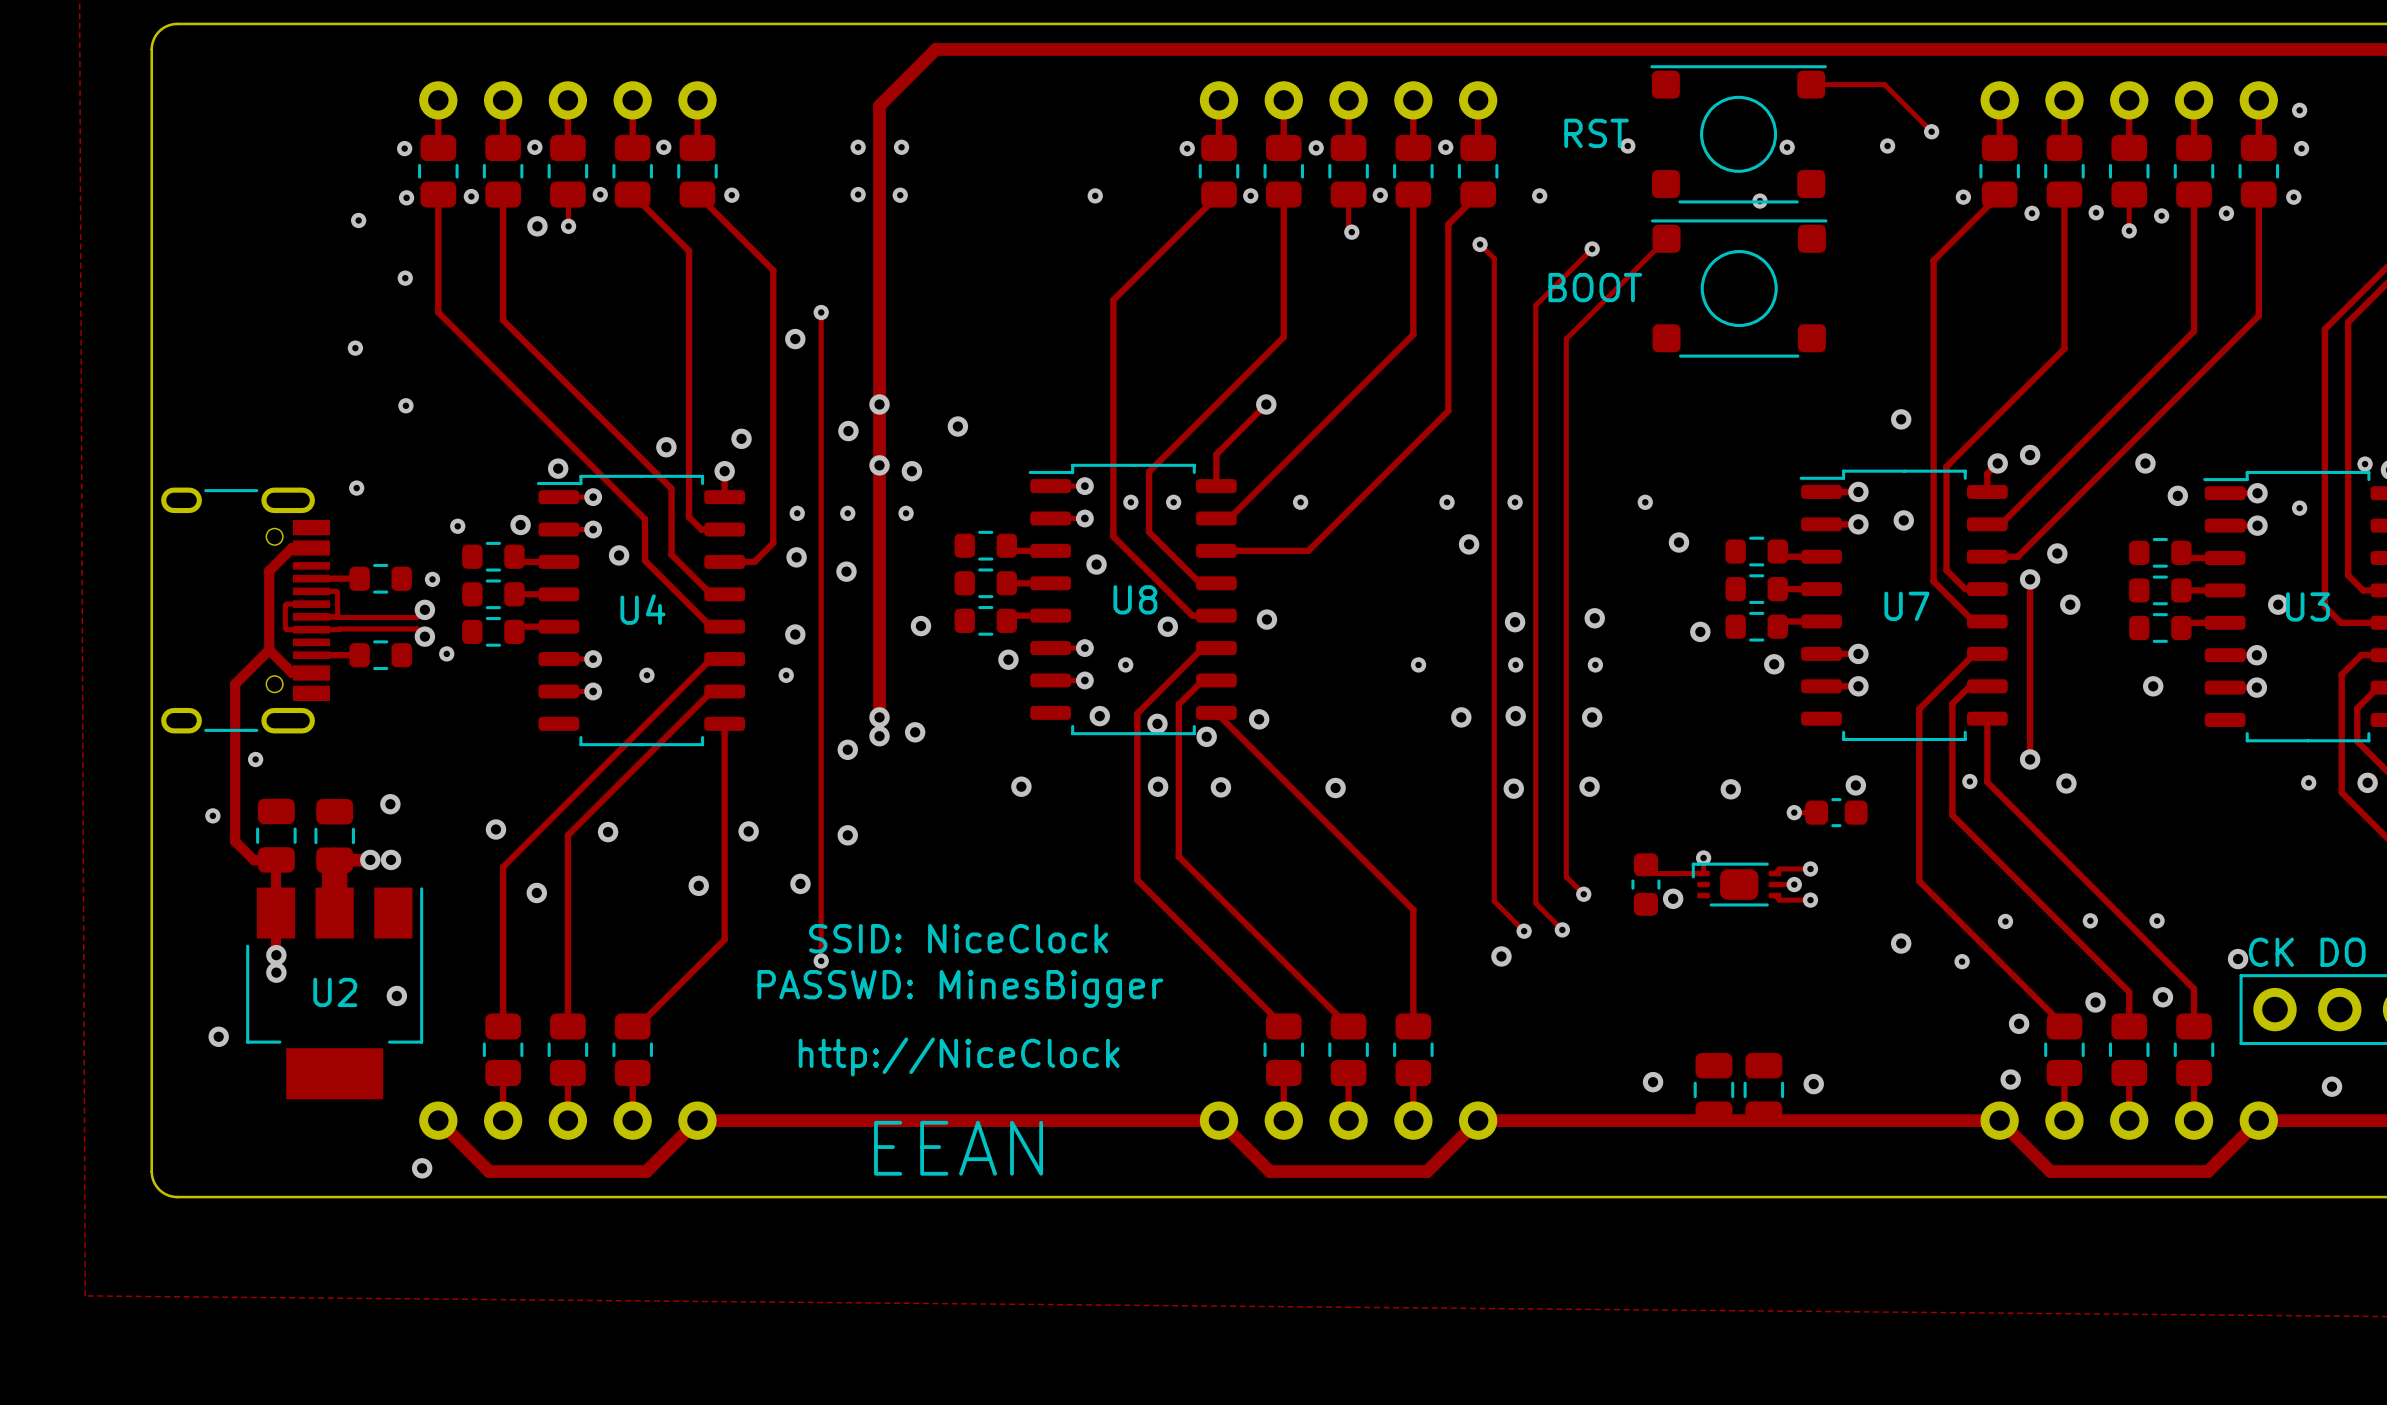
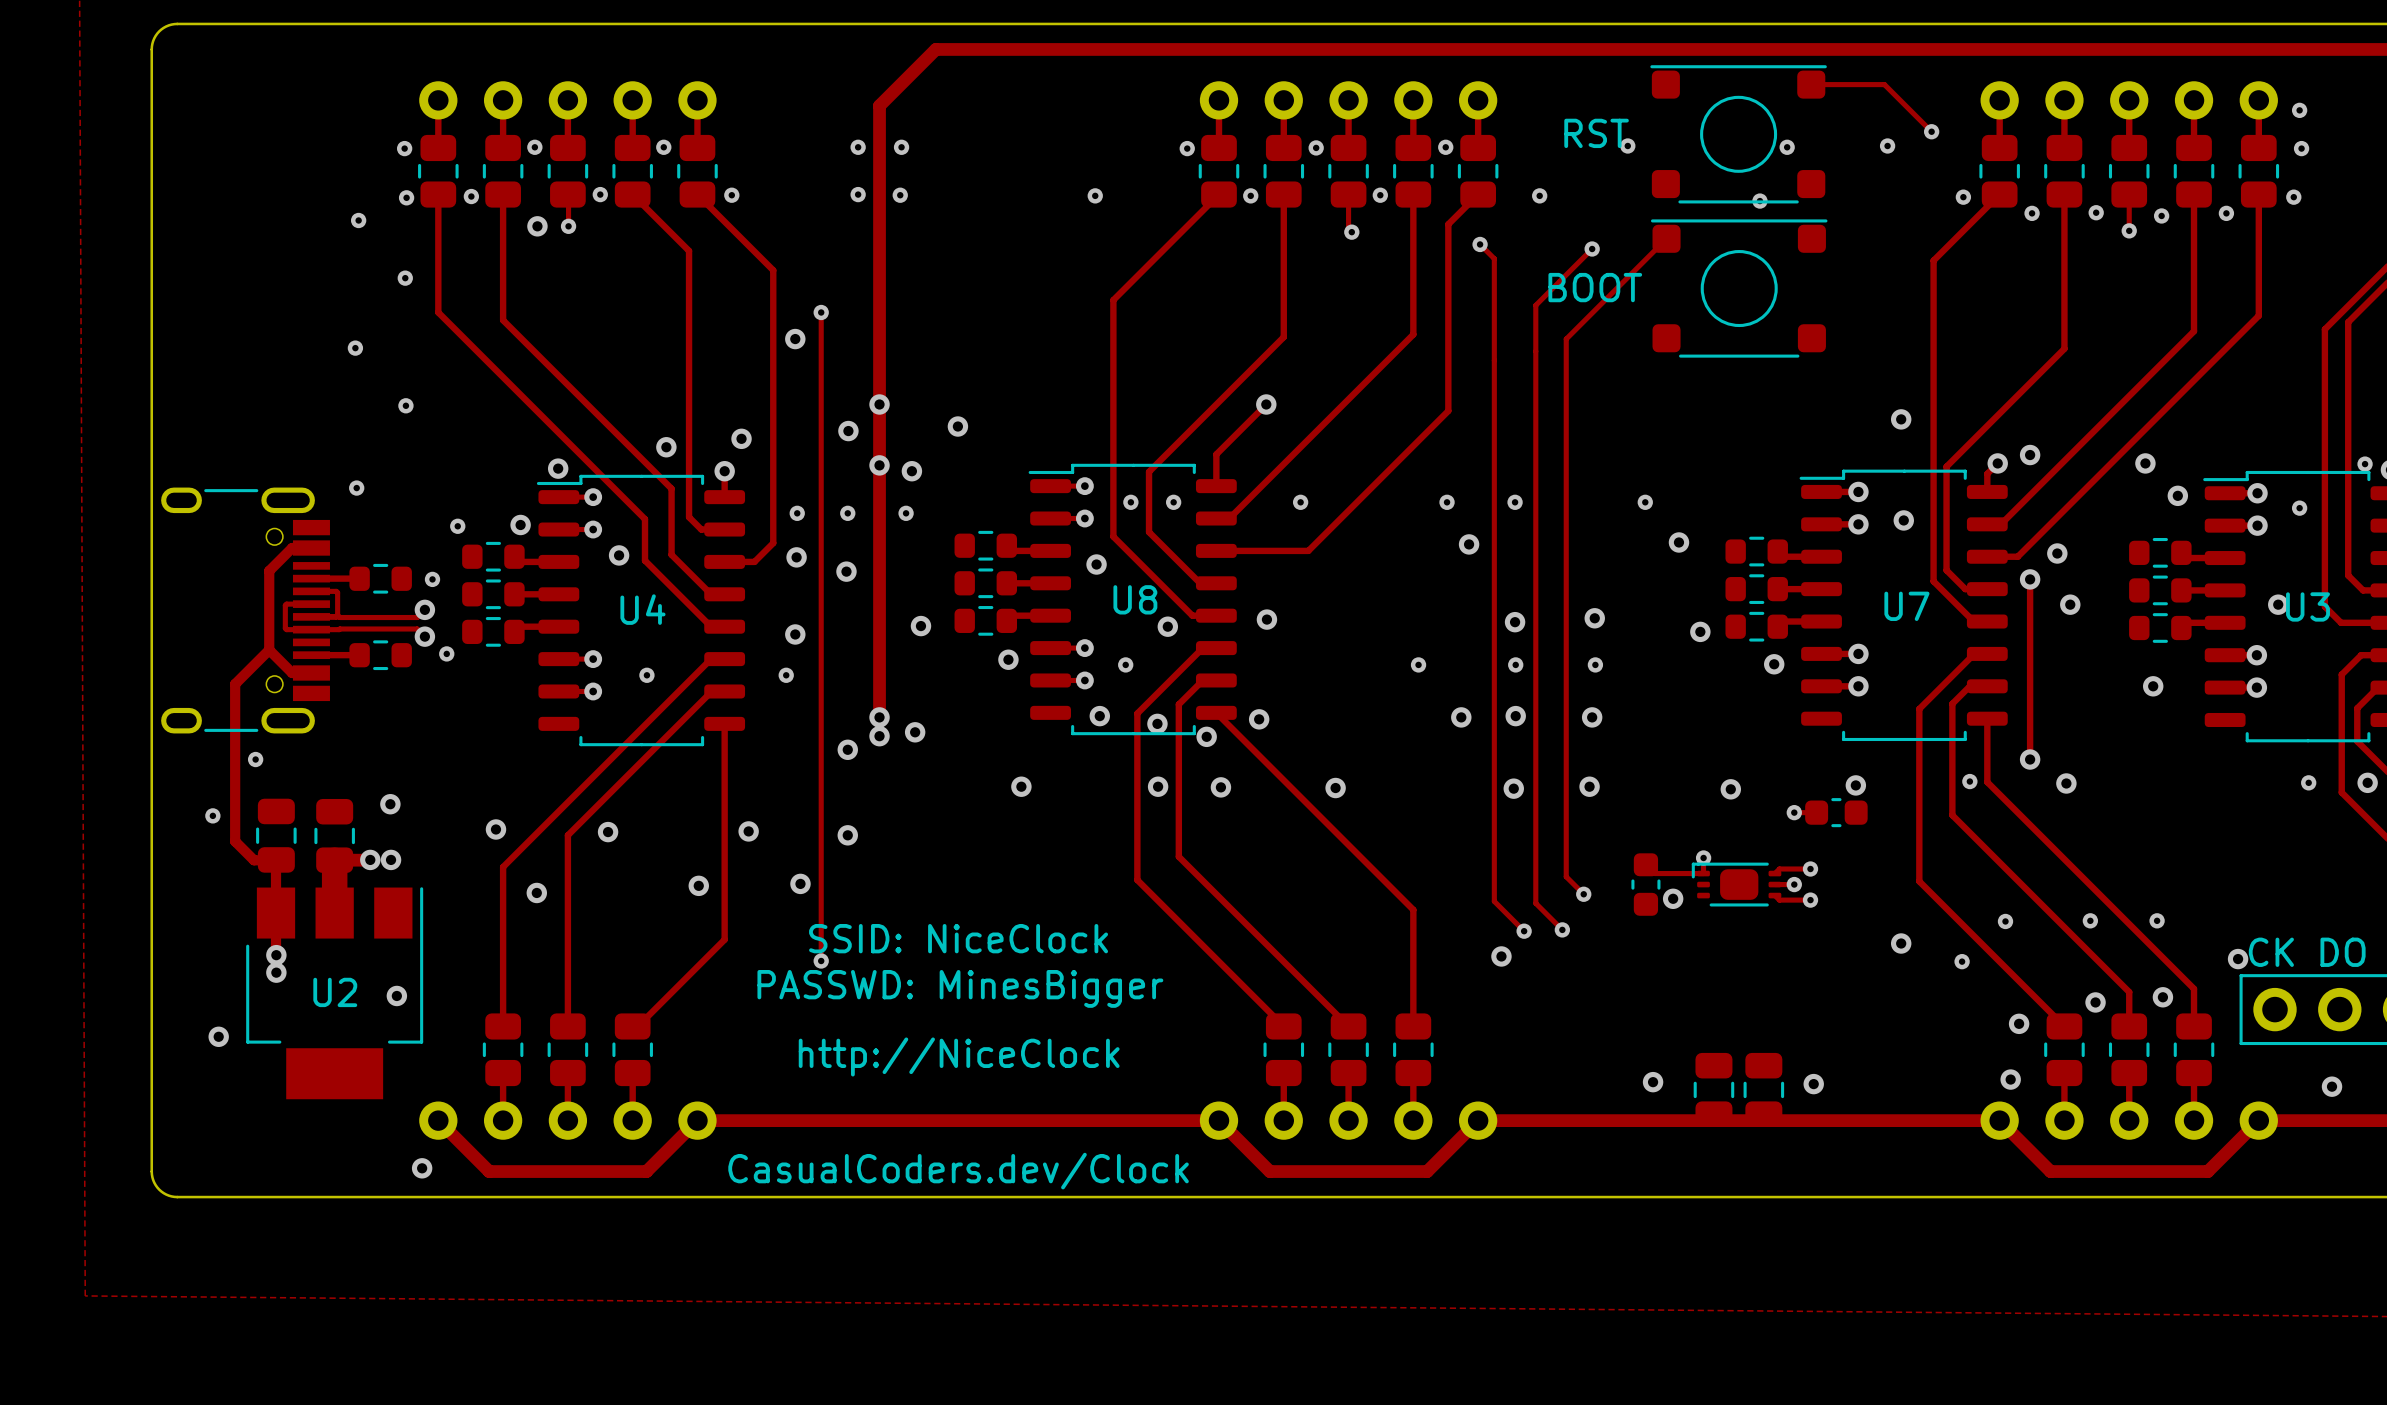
text: EEAN (958, 1148) -> CasualCoders.dev/Clock (958, 1171)

